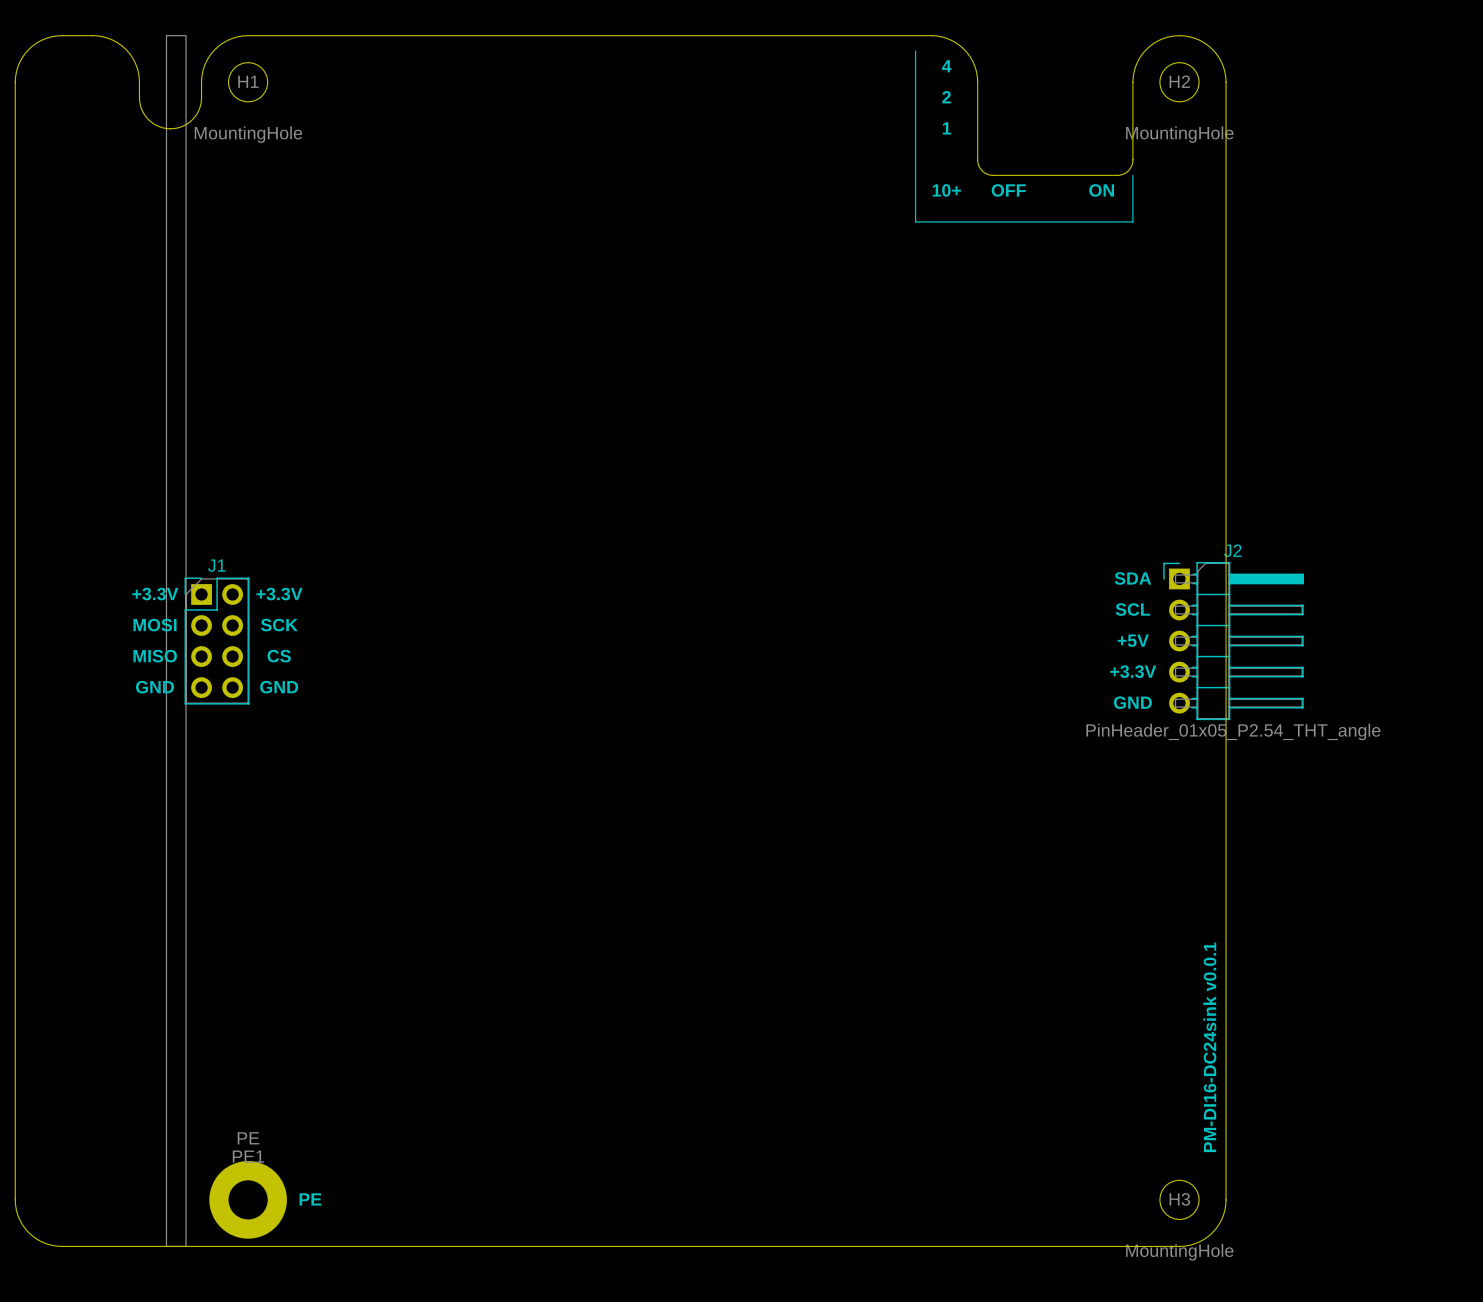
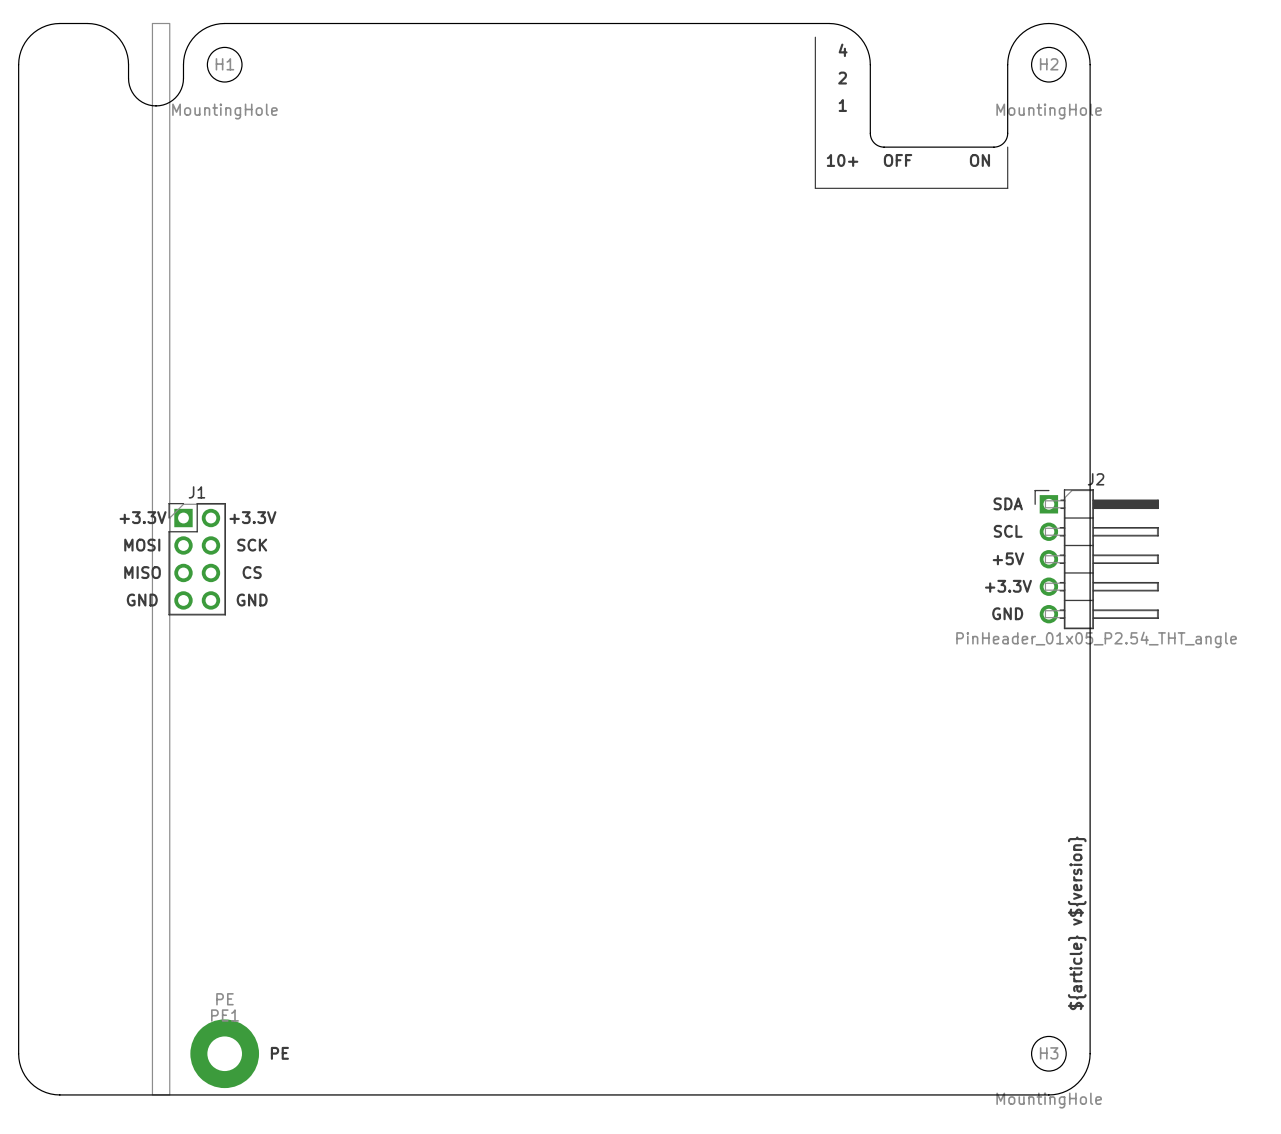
text: PM-DI16-DC24sink v0.0.1 (1209, 1047) -> ${article} v${version} (1077, 923)

